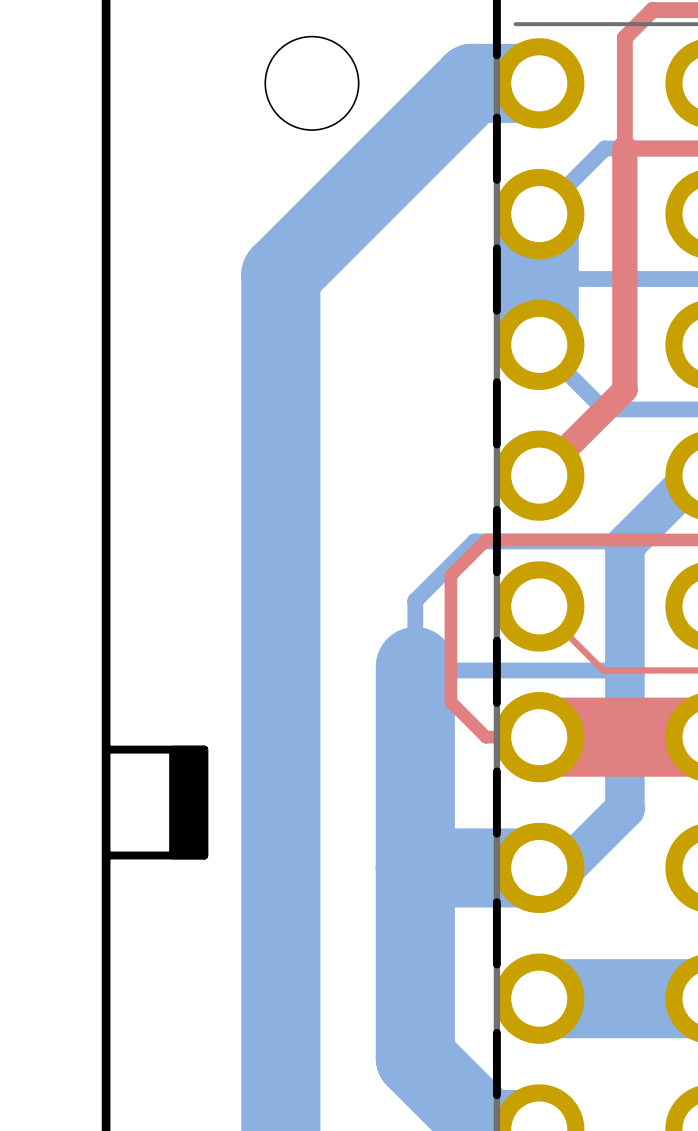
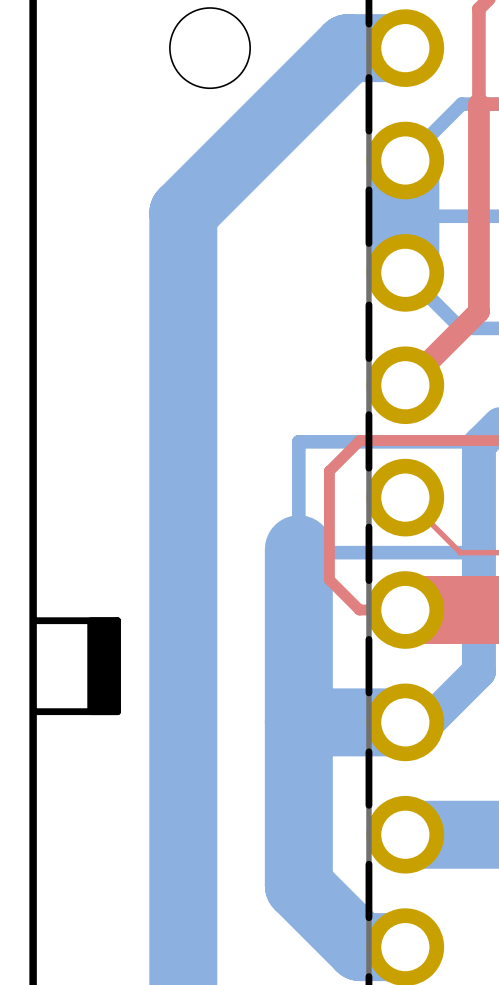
bottom track: (474, 541) (415, 600) -> (349, 441) (298, 441) (298, 492)

